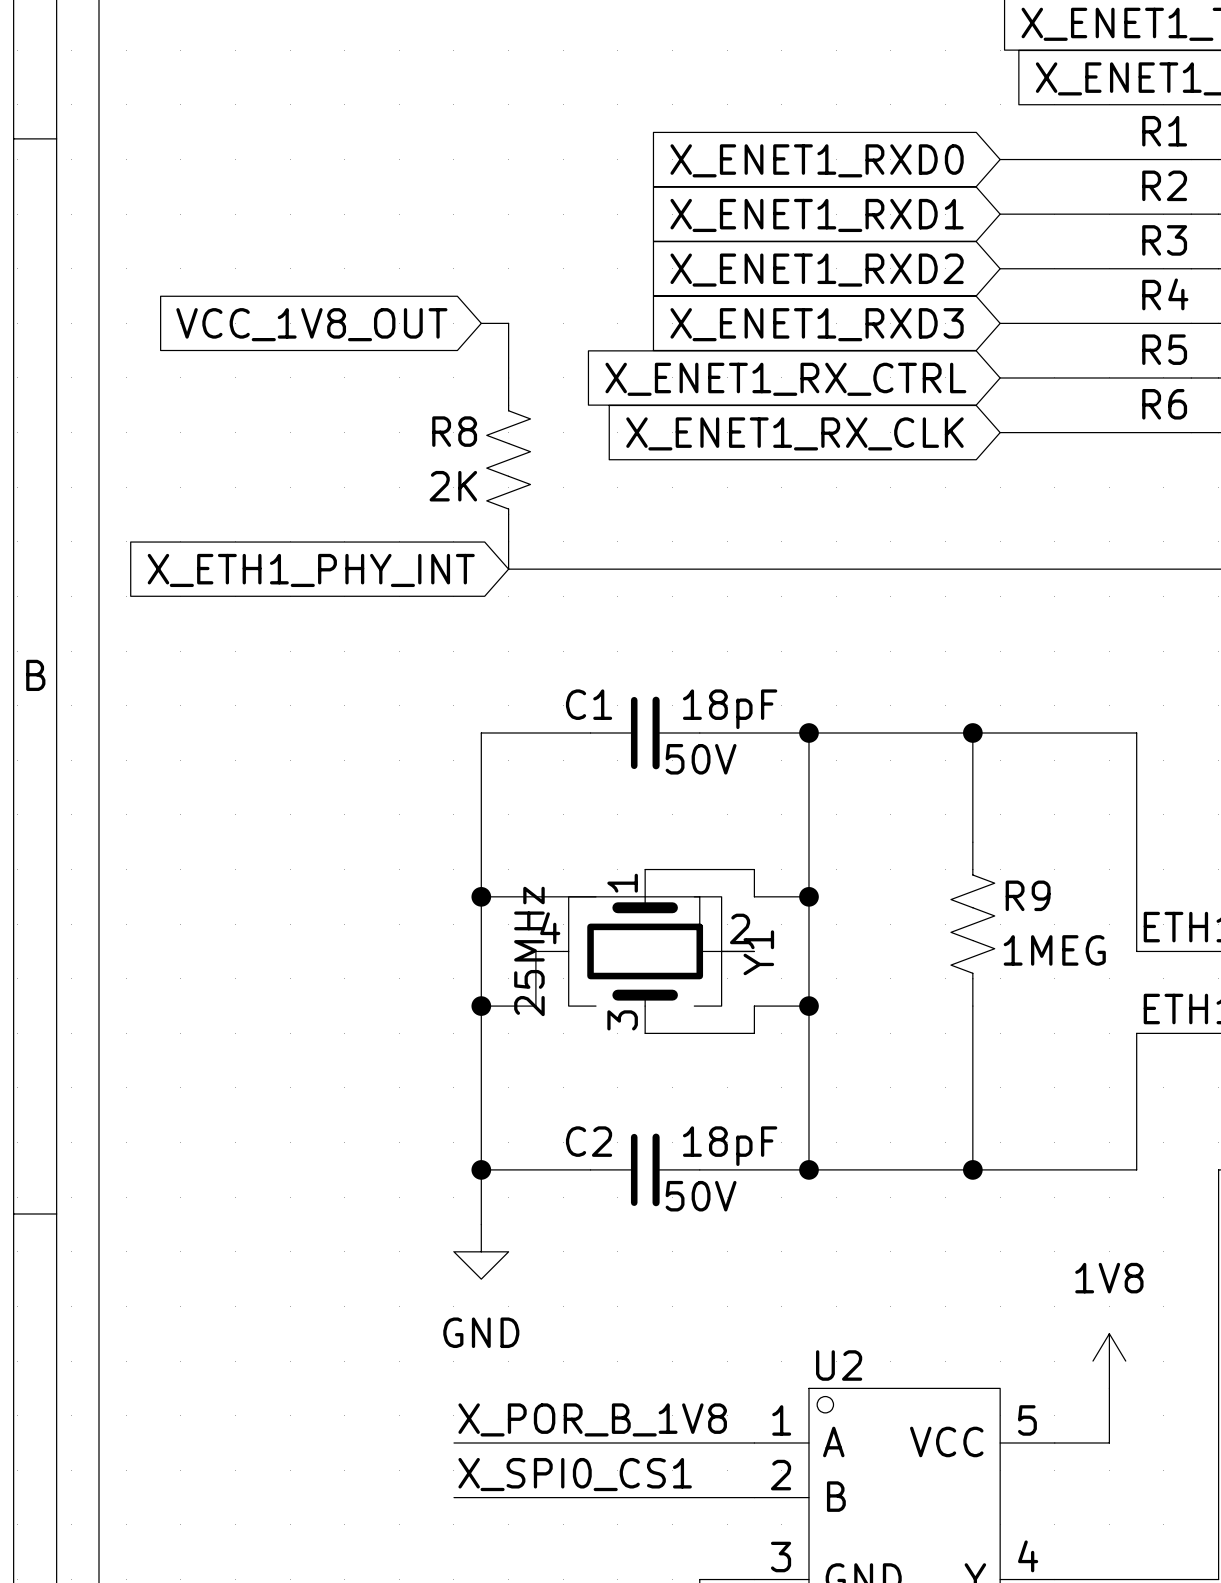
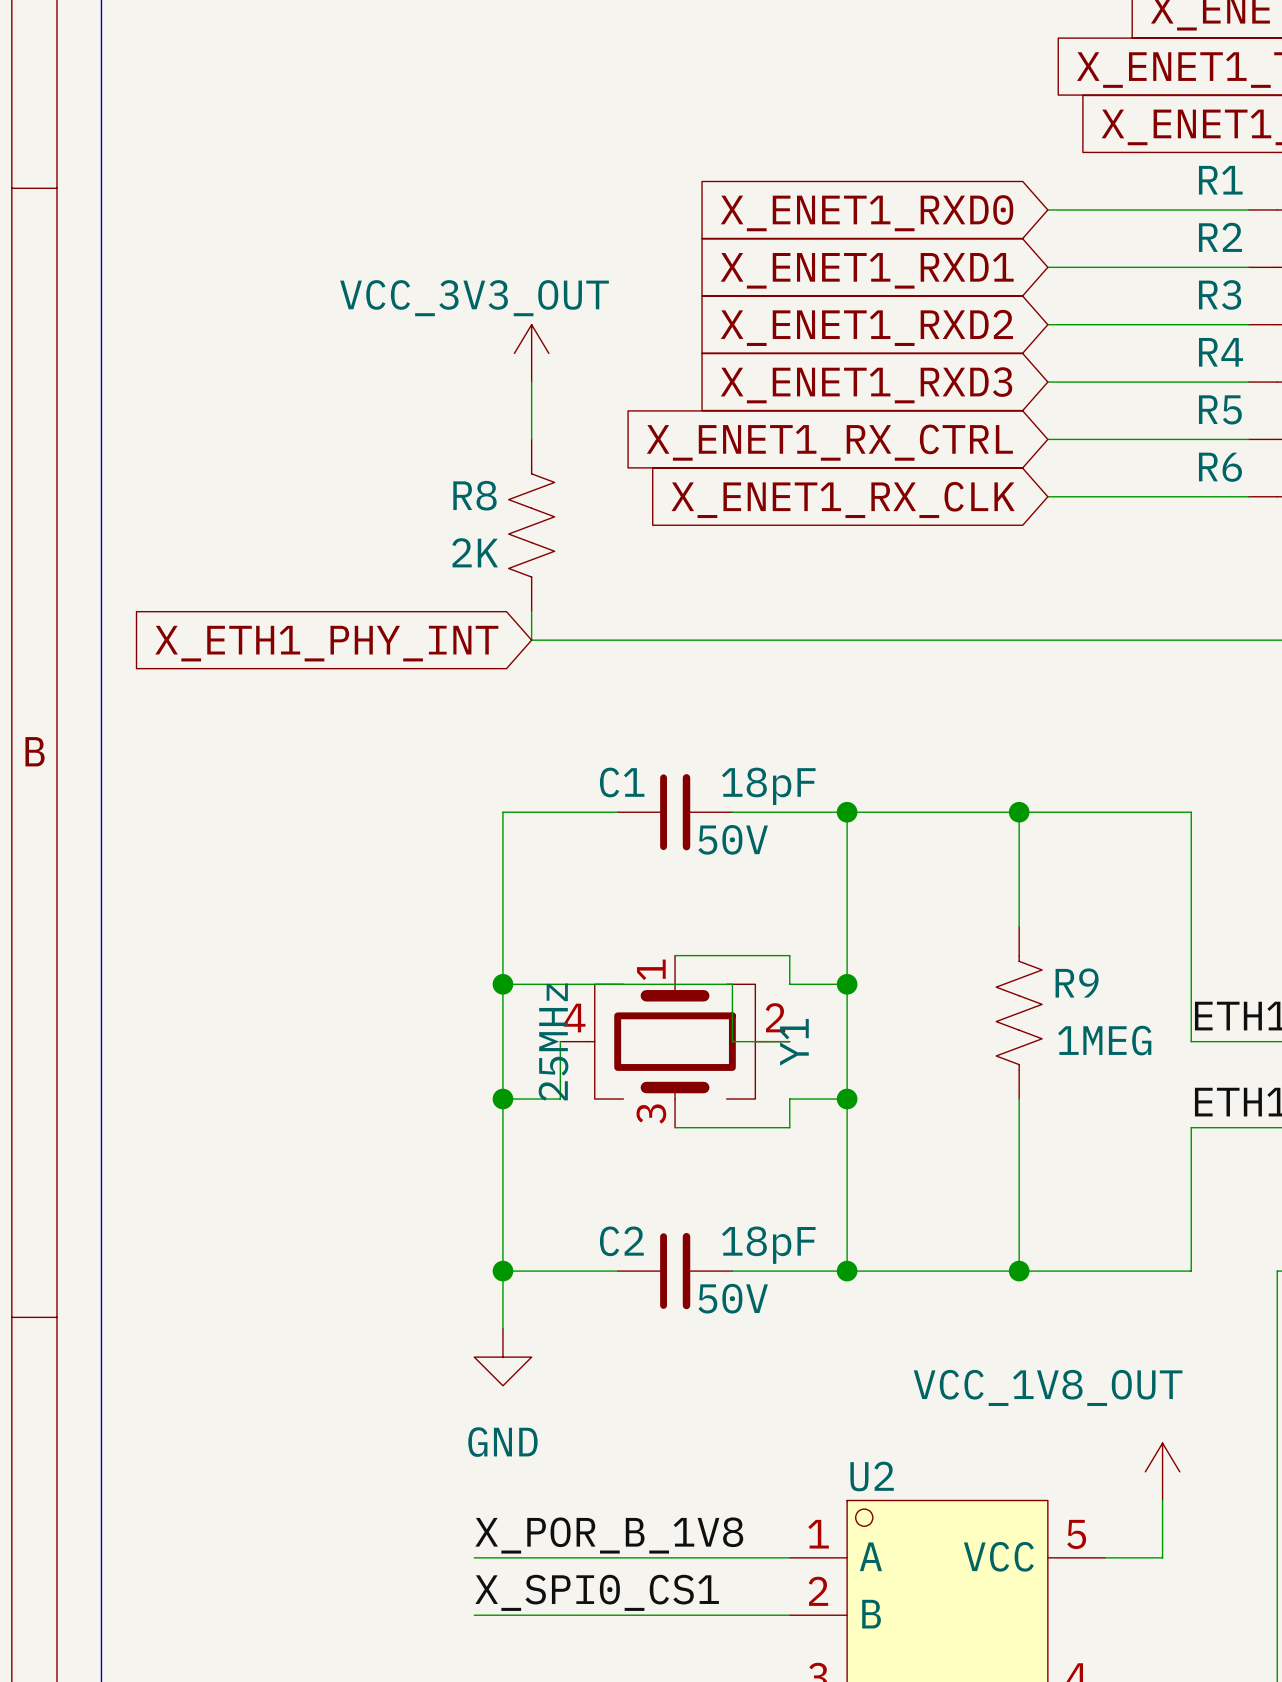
power symbol: none -> VCC_3V3_OUT (531, 353)
wire: (481, 323) (508, 323) -> none
global label: VCC_1V8_OUT (311, 324) -> none
power symbol: 1V8 (1109, 1361) -> VCC_1V8_OUT (1162, 1471)

